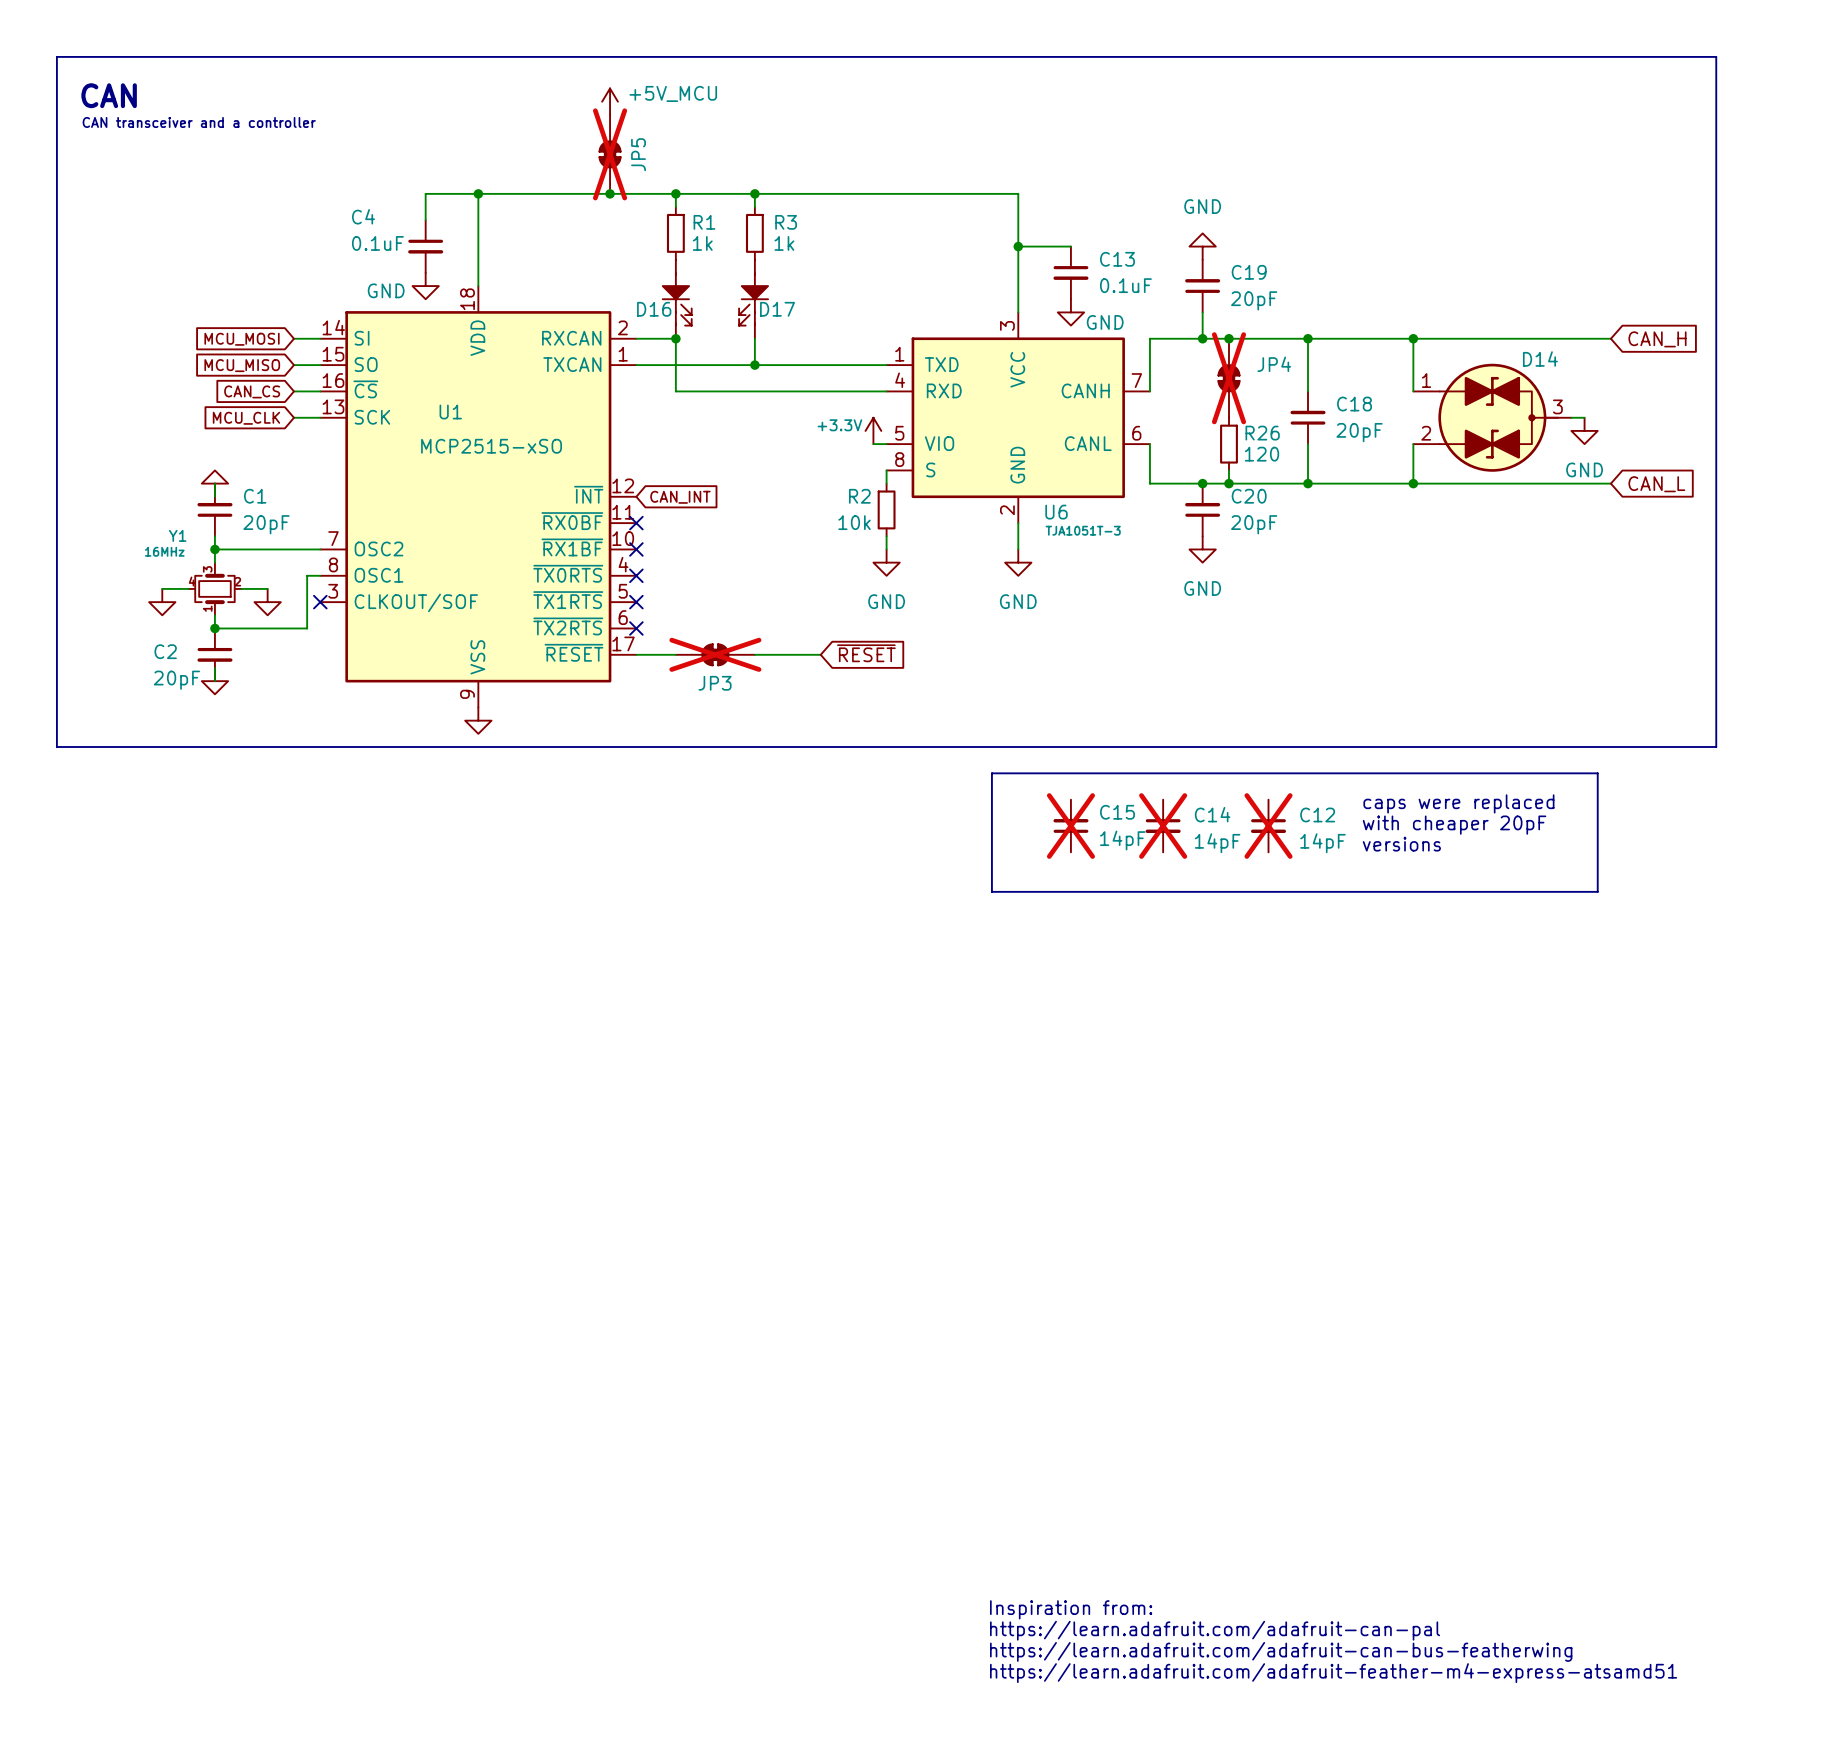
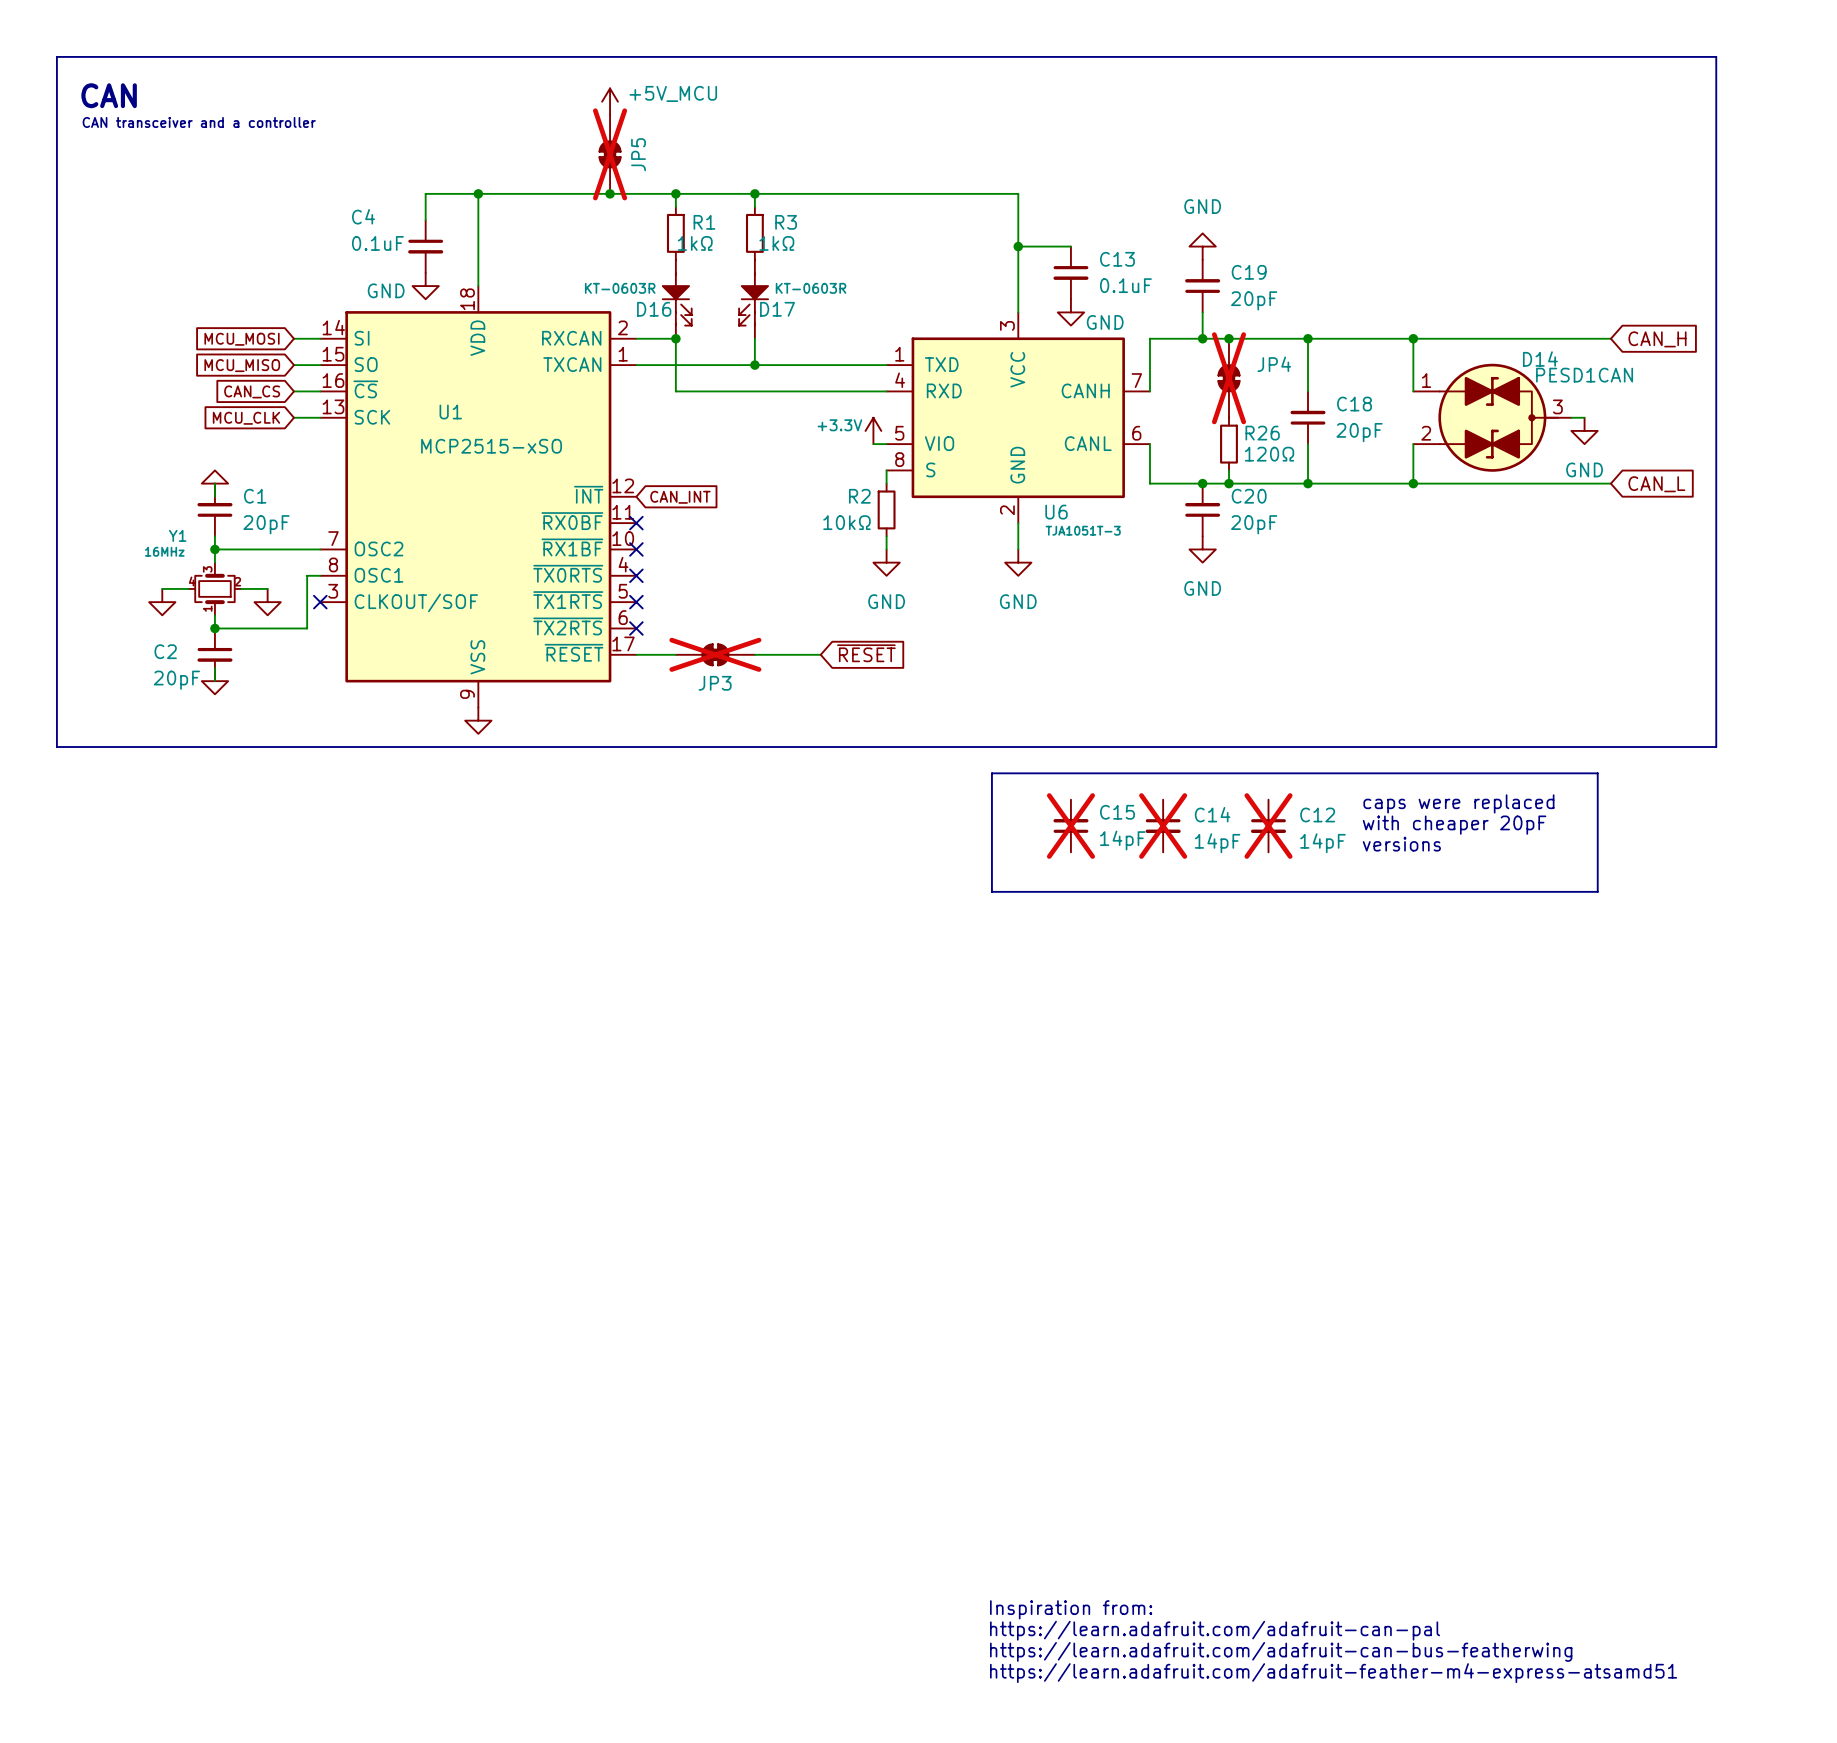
R1 value: 1k (702, 243) -> 1kΩ (695, 243)
R3 value: 1k (784, 243) -> 1kΩ (776, 243)
D16 value: none -> KT-0603R (620, 288)
D17 value: none -> KT-0603R (811, 288)
D14 value: none -> PESD1CAN (1584, 375)
R26 value: 120 (1262, 454) -> 120Ω (1269, 454)
R2 value: 10k (854, 522) -> 10kΩ (846, 522)

